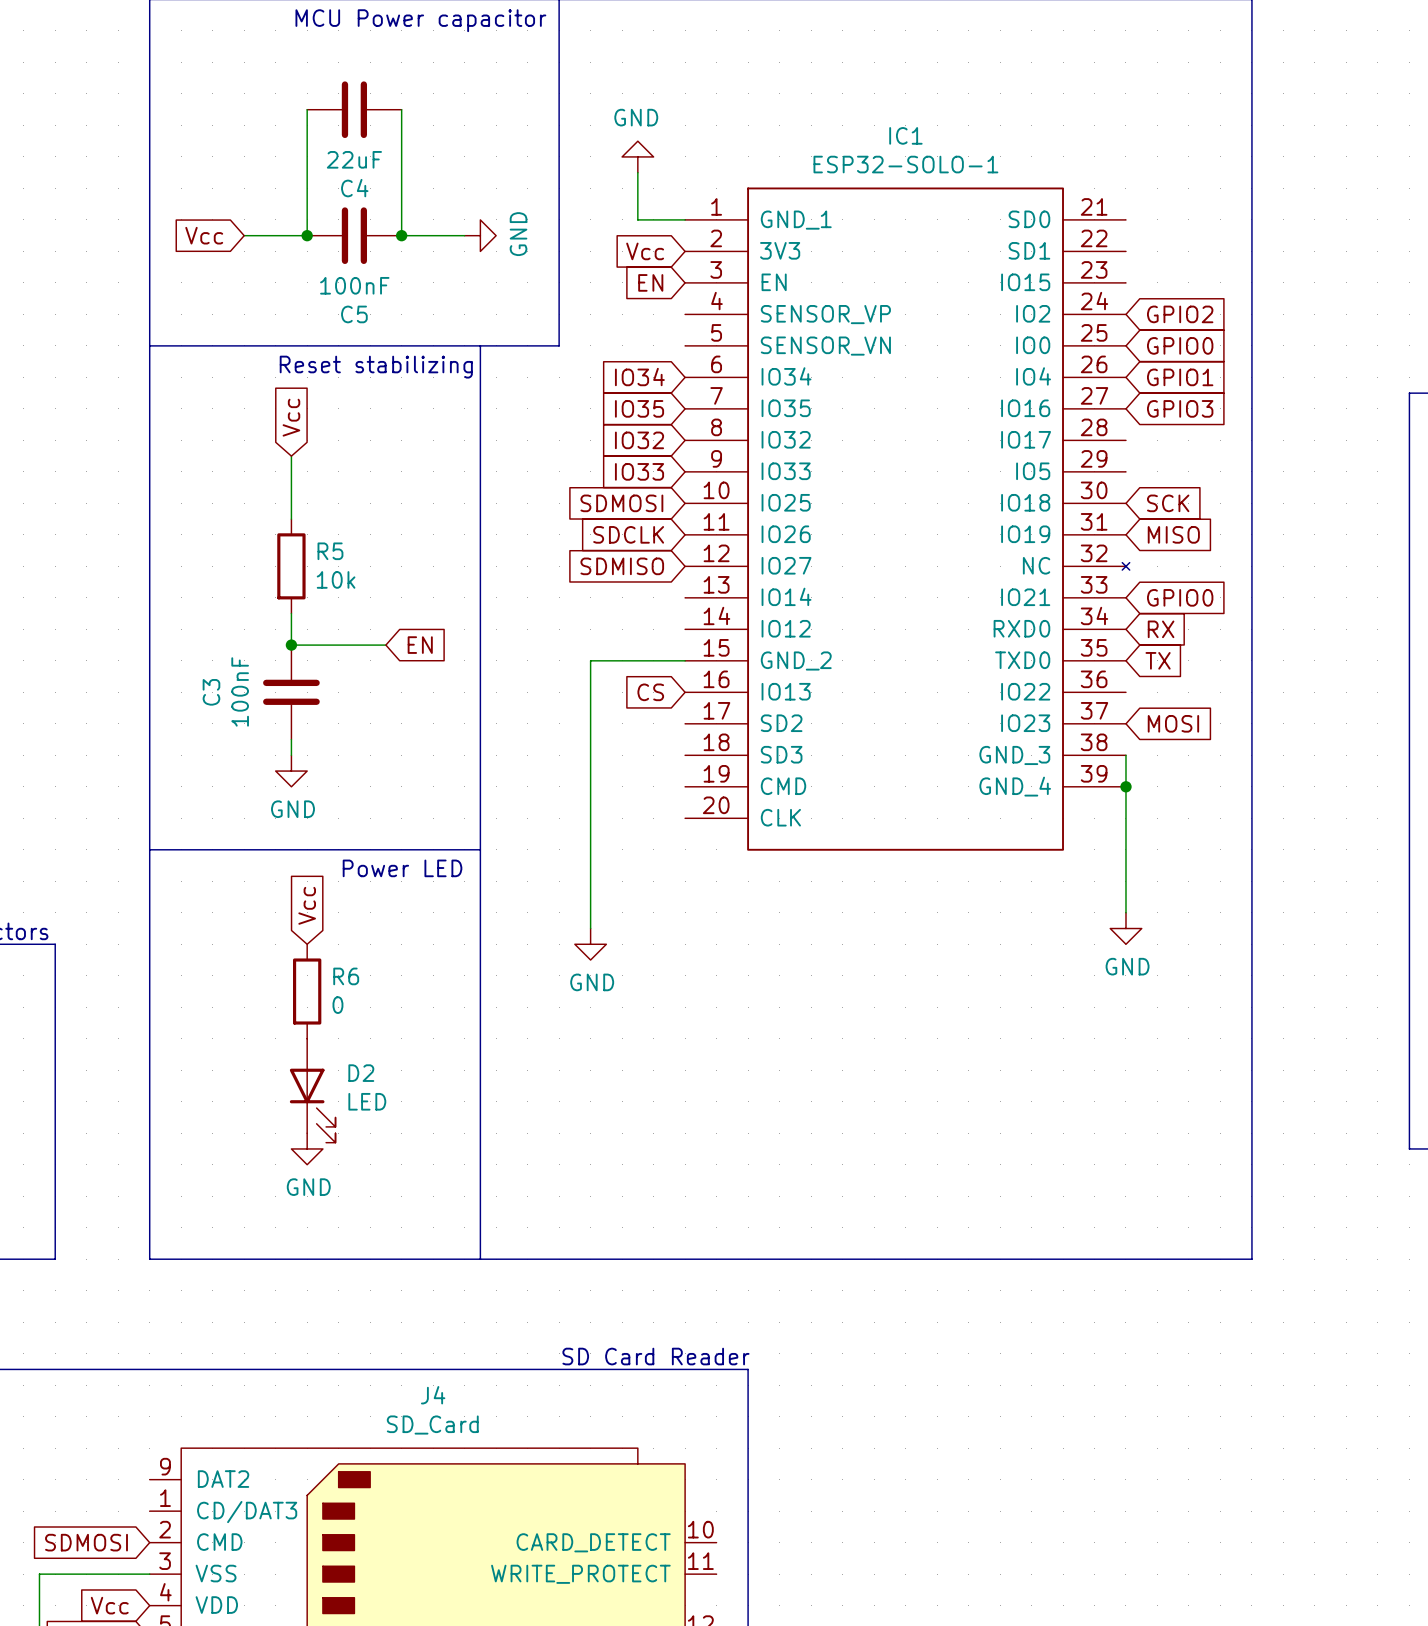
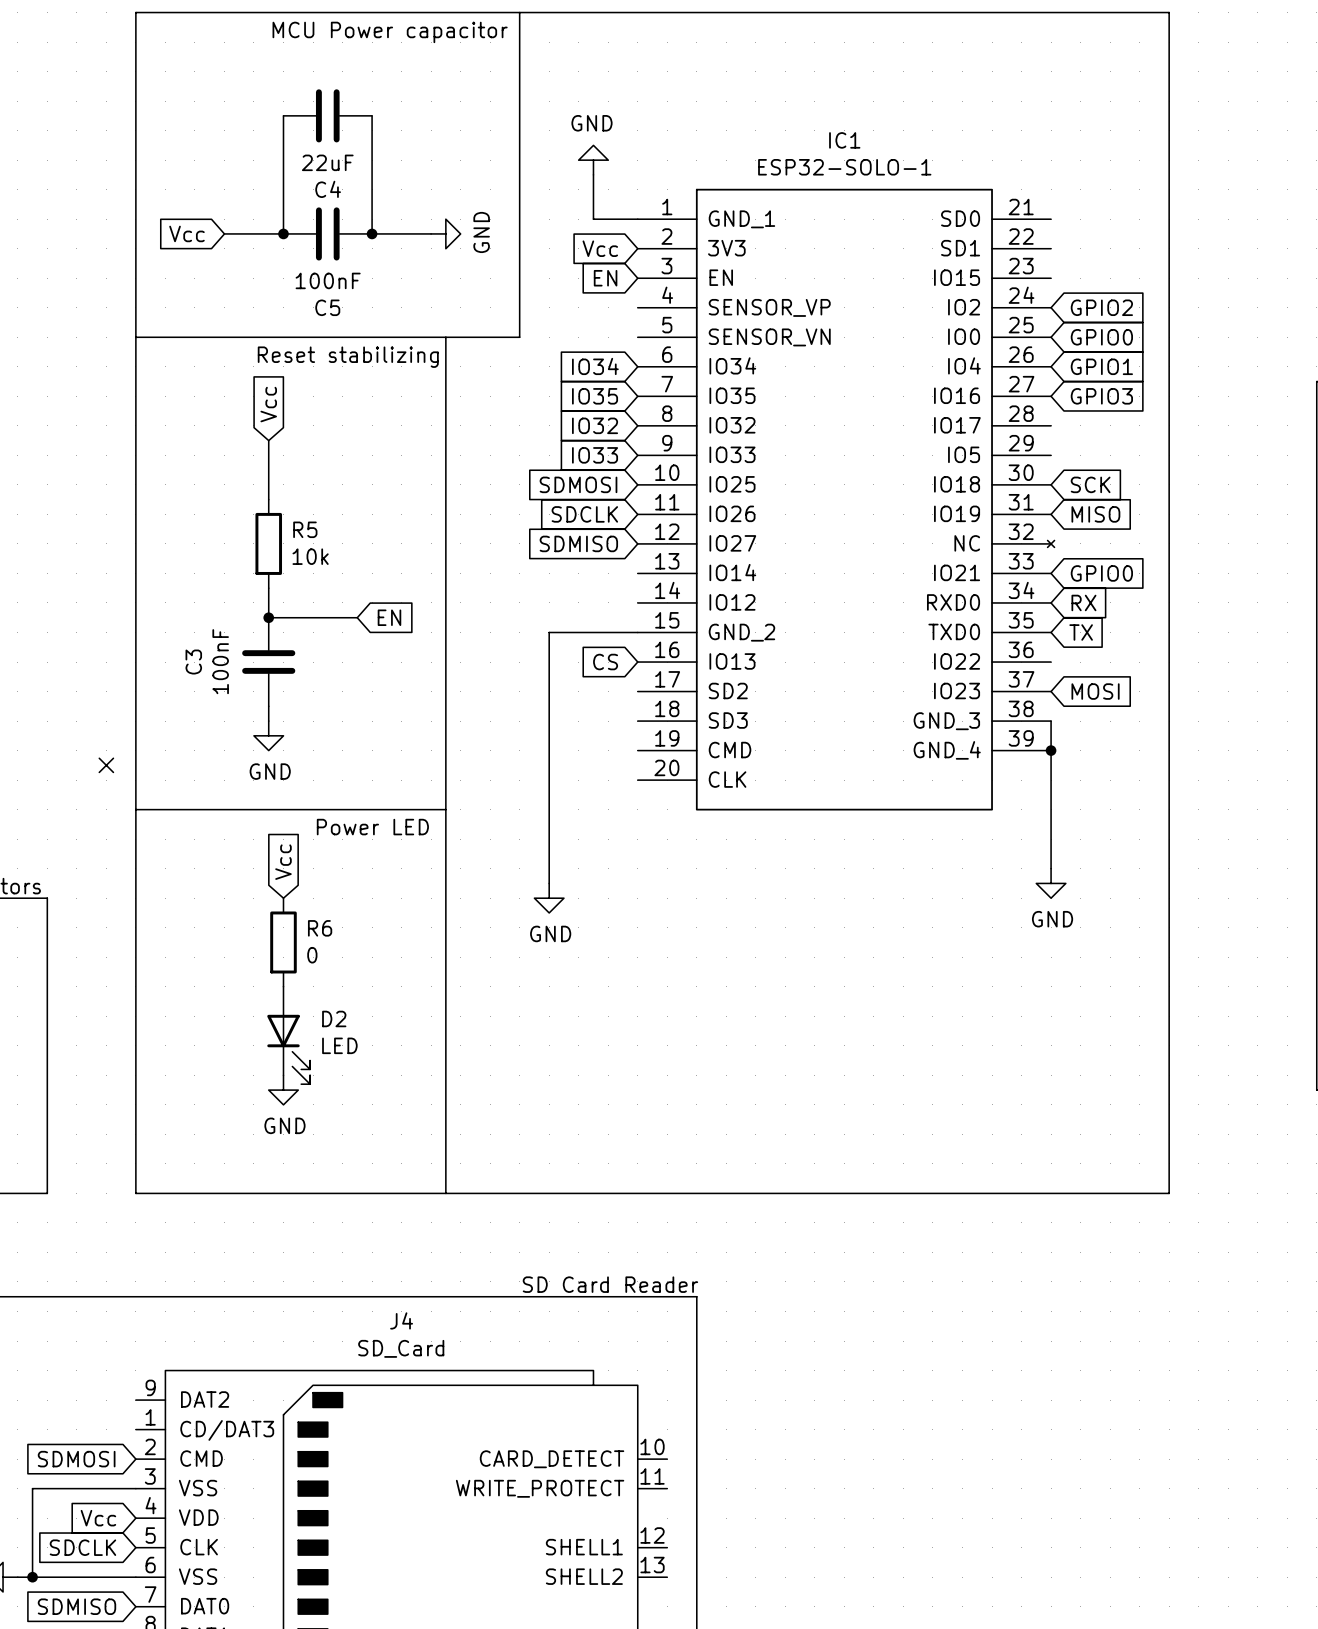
no-connect mark: none -> (106, 765)

